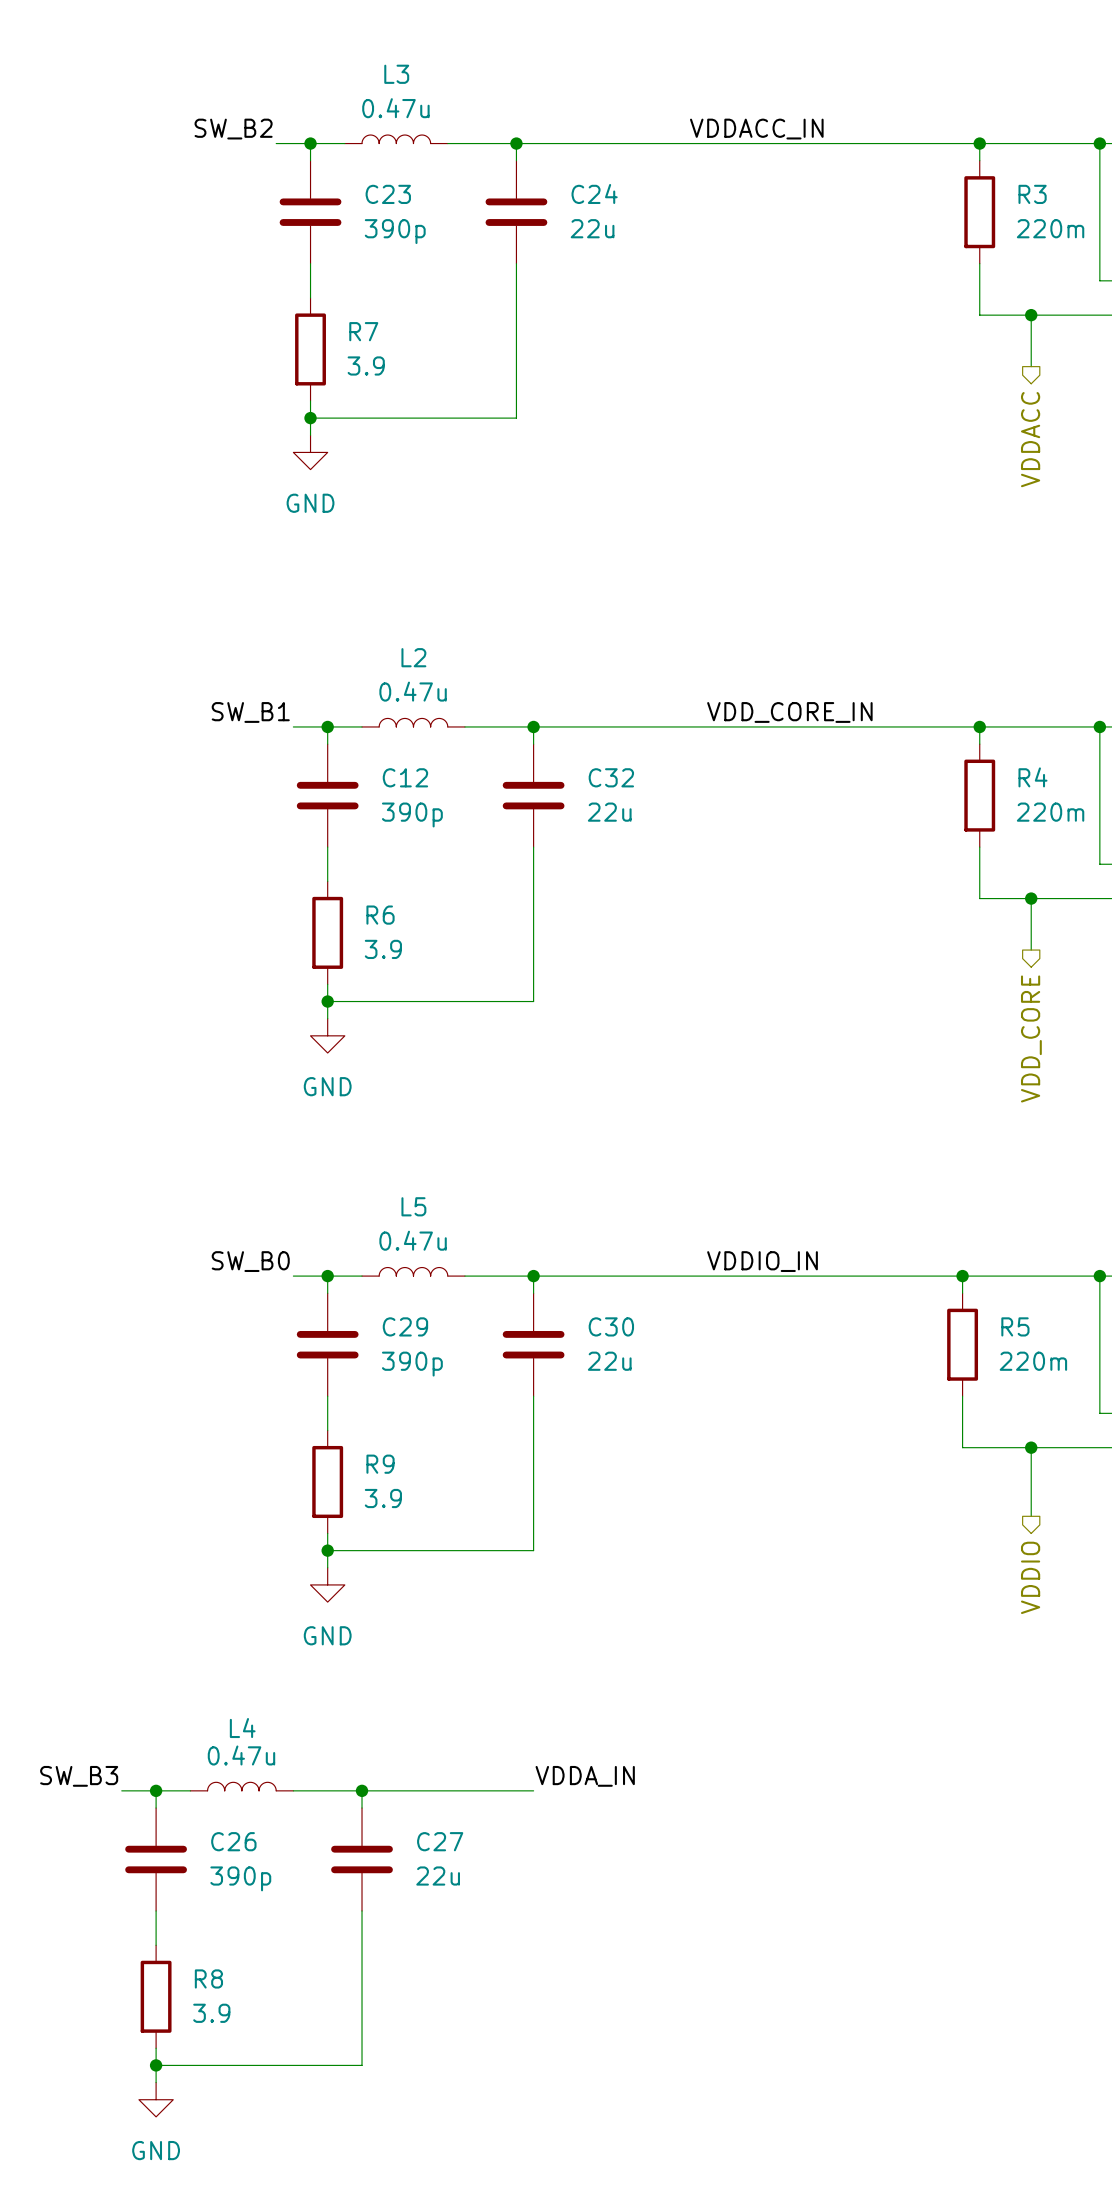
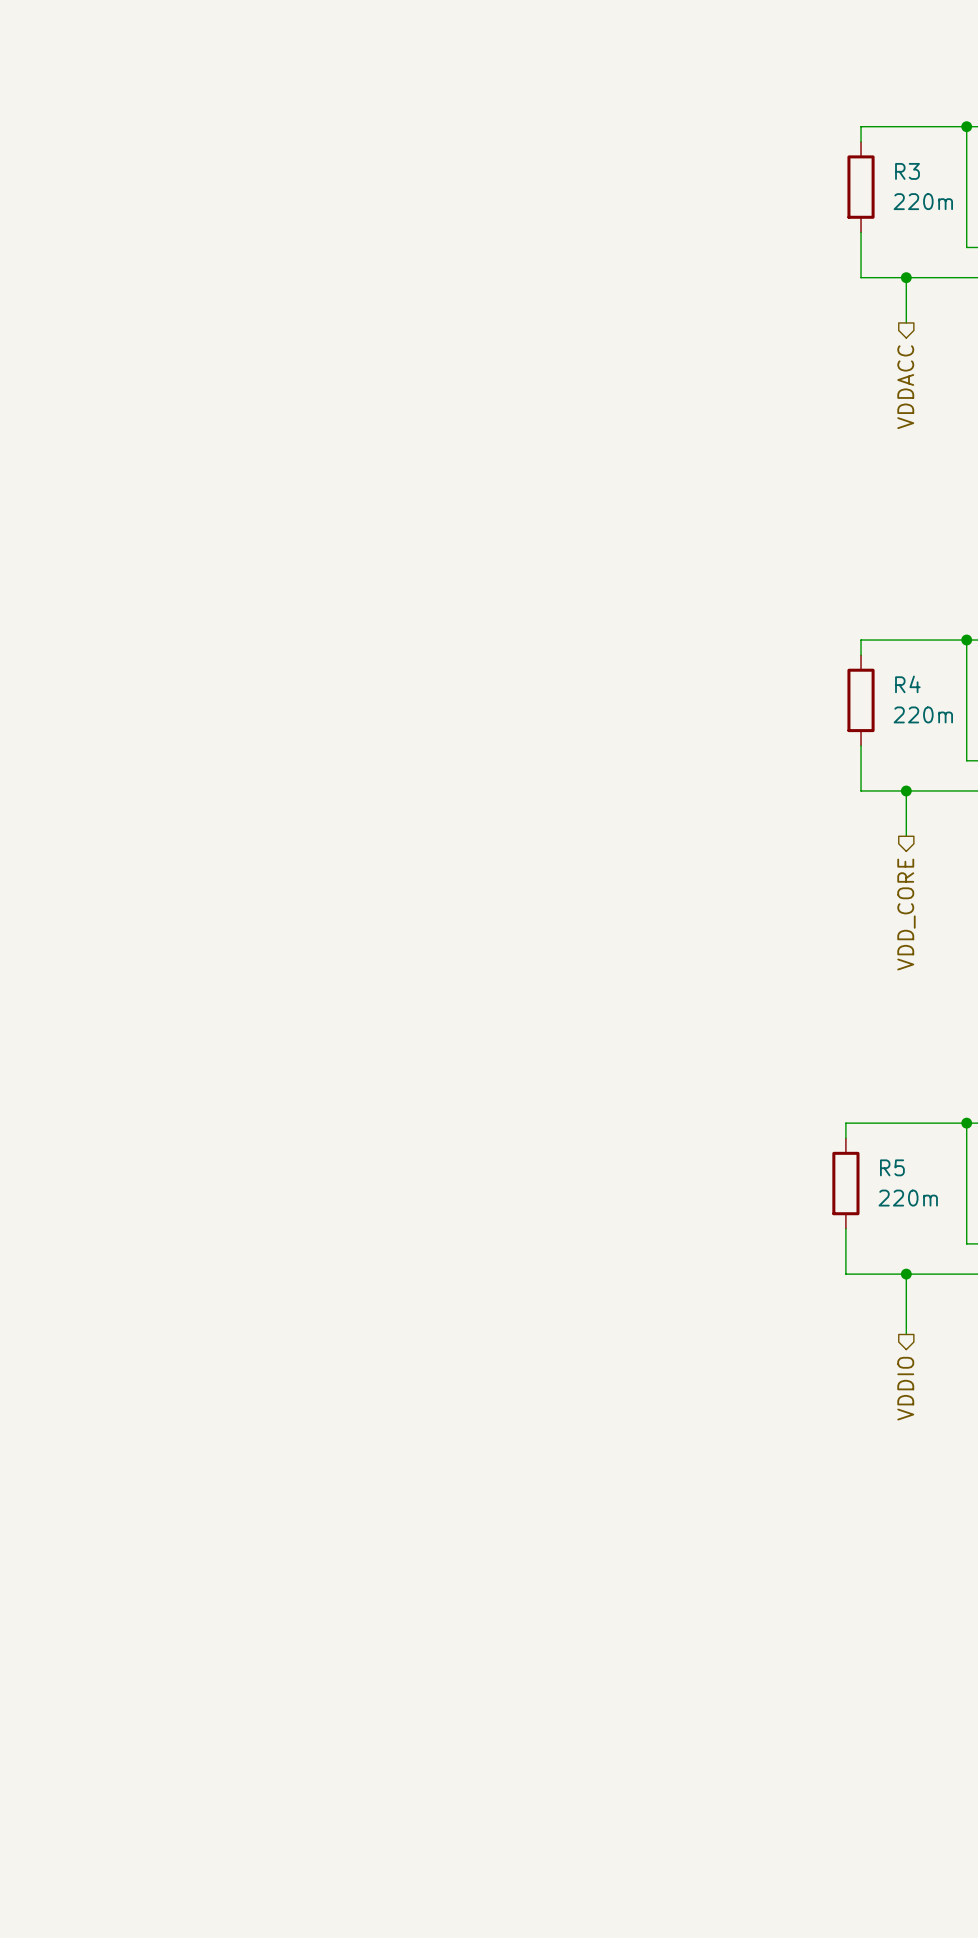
label: SW_B2 (233, 129) -> none
label: VDDACC_IN (756, 129) -> none
L3: 0.47u (396, 139) -> none
wire: (276, 143) (344, 143) -> none
wire: (310, 143) (310, 160) -> none
junction: (310, 143) -> none
wire: (447, 143) (979, 143) -> none
wire: (516, 143) (516, 160) -> none
junction: (516, 143) -> none
junction: (979, 143) -> none
C23: 390p (310, 212) -> none
C24: 22u (516, 212) -> none
wire: (310, 263) (310, 297) -> none
wire: (516, 263) (516, 418) (310, 418) -> none
R7: 3.9 (310, 349) -> none
wire: (310, 400) (310, 435) -> none
junction: (310, 418) -> none
power symbol: GND (310, 452) -> none
label: SW_B1 (250, 712) -> none
label: VDD_CORE_IN (789, 712) -> none
L2: 0.47u (413, 722) -> none
wire: (293, 726) (362, 726) -> none
wire: (327, 726) (327, 744) -> none
junction: (327, 726) -> none
wire: (464, 726) (979, 726) -> none
wire: (533, 726) (533, 744) -> none
junction: (533, 726) -> none
junction: (979, 726) -> none
C12: 390p (327, 795) -> none
C32: 22u (533, 795) -> none
wire: (327, 847) (327, 881) -> none
wire: (533, 847) (533, 1001) (327, 1001) -> none
R6: 3.9 (327, 932) -> none
wire: (327, 984) (327, 1018) -> none
junction: (327, 1001) -> none
power symbol: GND (327, 1035) -> none
label: SW_B0 (250, 1261) -> none
label: VDDIO_IN (762, 1261) -> none
L5: 0.47u (413, 1271) -> none
wire: (293, 1276) (362, 1276) -> none
wire: (327, 1276) (327, 1293) -> none
junction: (327, 1276) -> none
wire: (464, 1276) (962, 1276) -> none
wire: (533, 1276) (533, 1293) -> none
junction: (533, 1276) -> none
junction: (962, 1276) -> none
C29: 390p (327, 1344) -> none
C30: 22u (533, 1344) -> none
wire: (327, 1396) (327, 1430) -> none
wire: (533, 1396) (533, 1550) (327, 1550) -> none
R9: 3.9 (327, 1481) -> none
wire: (327, 1533) (327, 1567) -> none
junction: (327, 1550) -> none
power symbol: GND (327, 1584) -> none
label: SW_B3 (79, 1776) -> none
label: VDDA_IN (585, 1776) -> none
L4: 0.47u (241, 1786) -> none
wire: (121, 1790) (190, 1790) -> none
wire: (156, 1790) (156, 1808) -> none
junction: (156, 1790) -> none
wire: (293, 1790) (533, 1790) -> none
wire: (362, 1790) (362, 1808) -> none
junction: (362, 1790) -> none
C26: 390p (156, 1859) -> none
C27: 22u (362, 1859) -> none
wire: (156, 1910) (156, 1945) -> none
wire: (362, 1910) (362, 2065) (156, 2065) -> none
R8: 3.9 (156, 1996) -> none
wire: (156, 2048) (156, 2082) -> none
junction: (156, 2065) -> none
power symbol: GND (156, 2099) -> none

